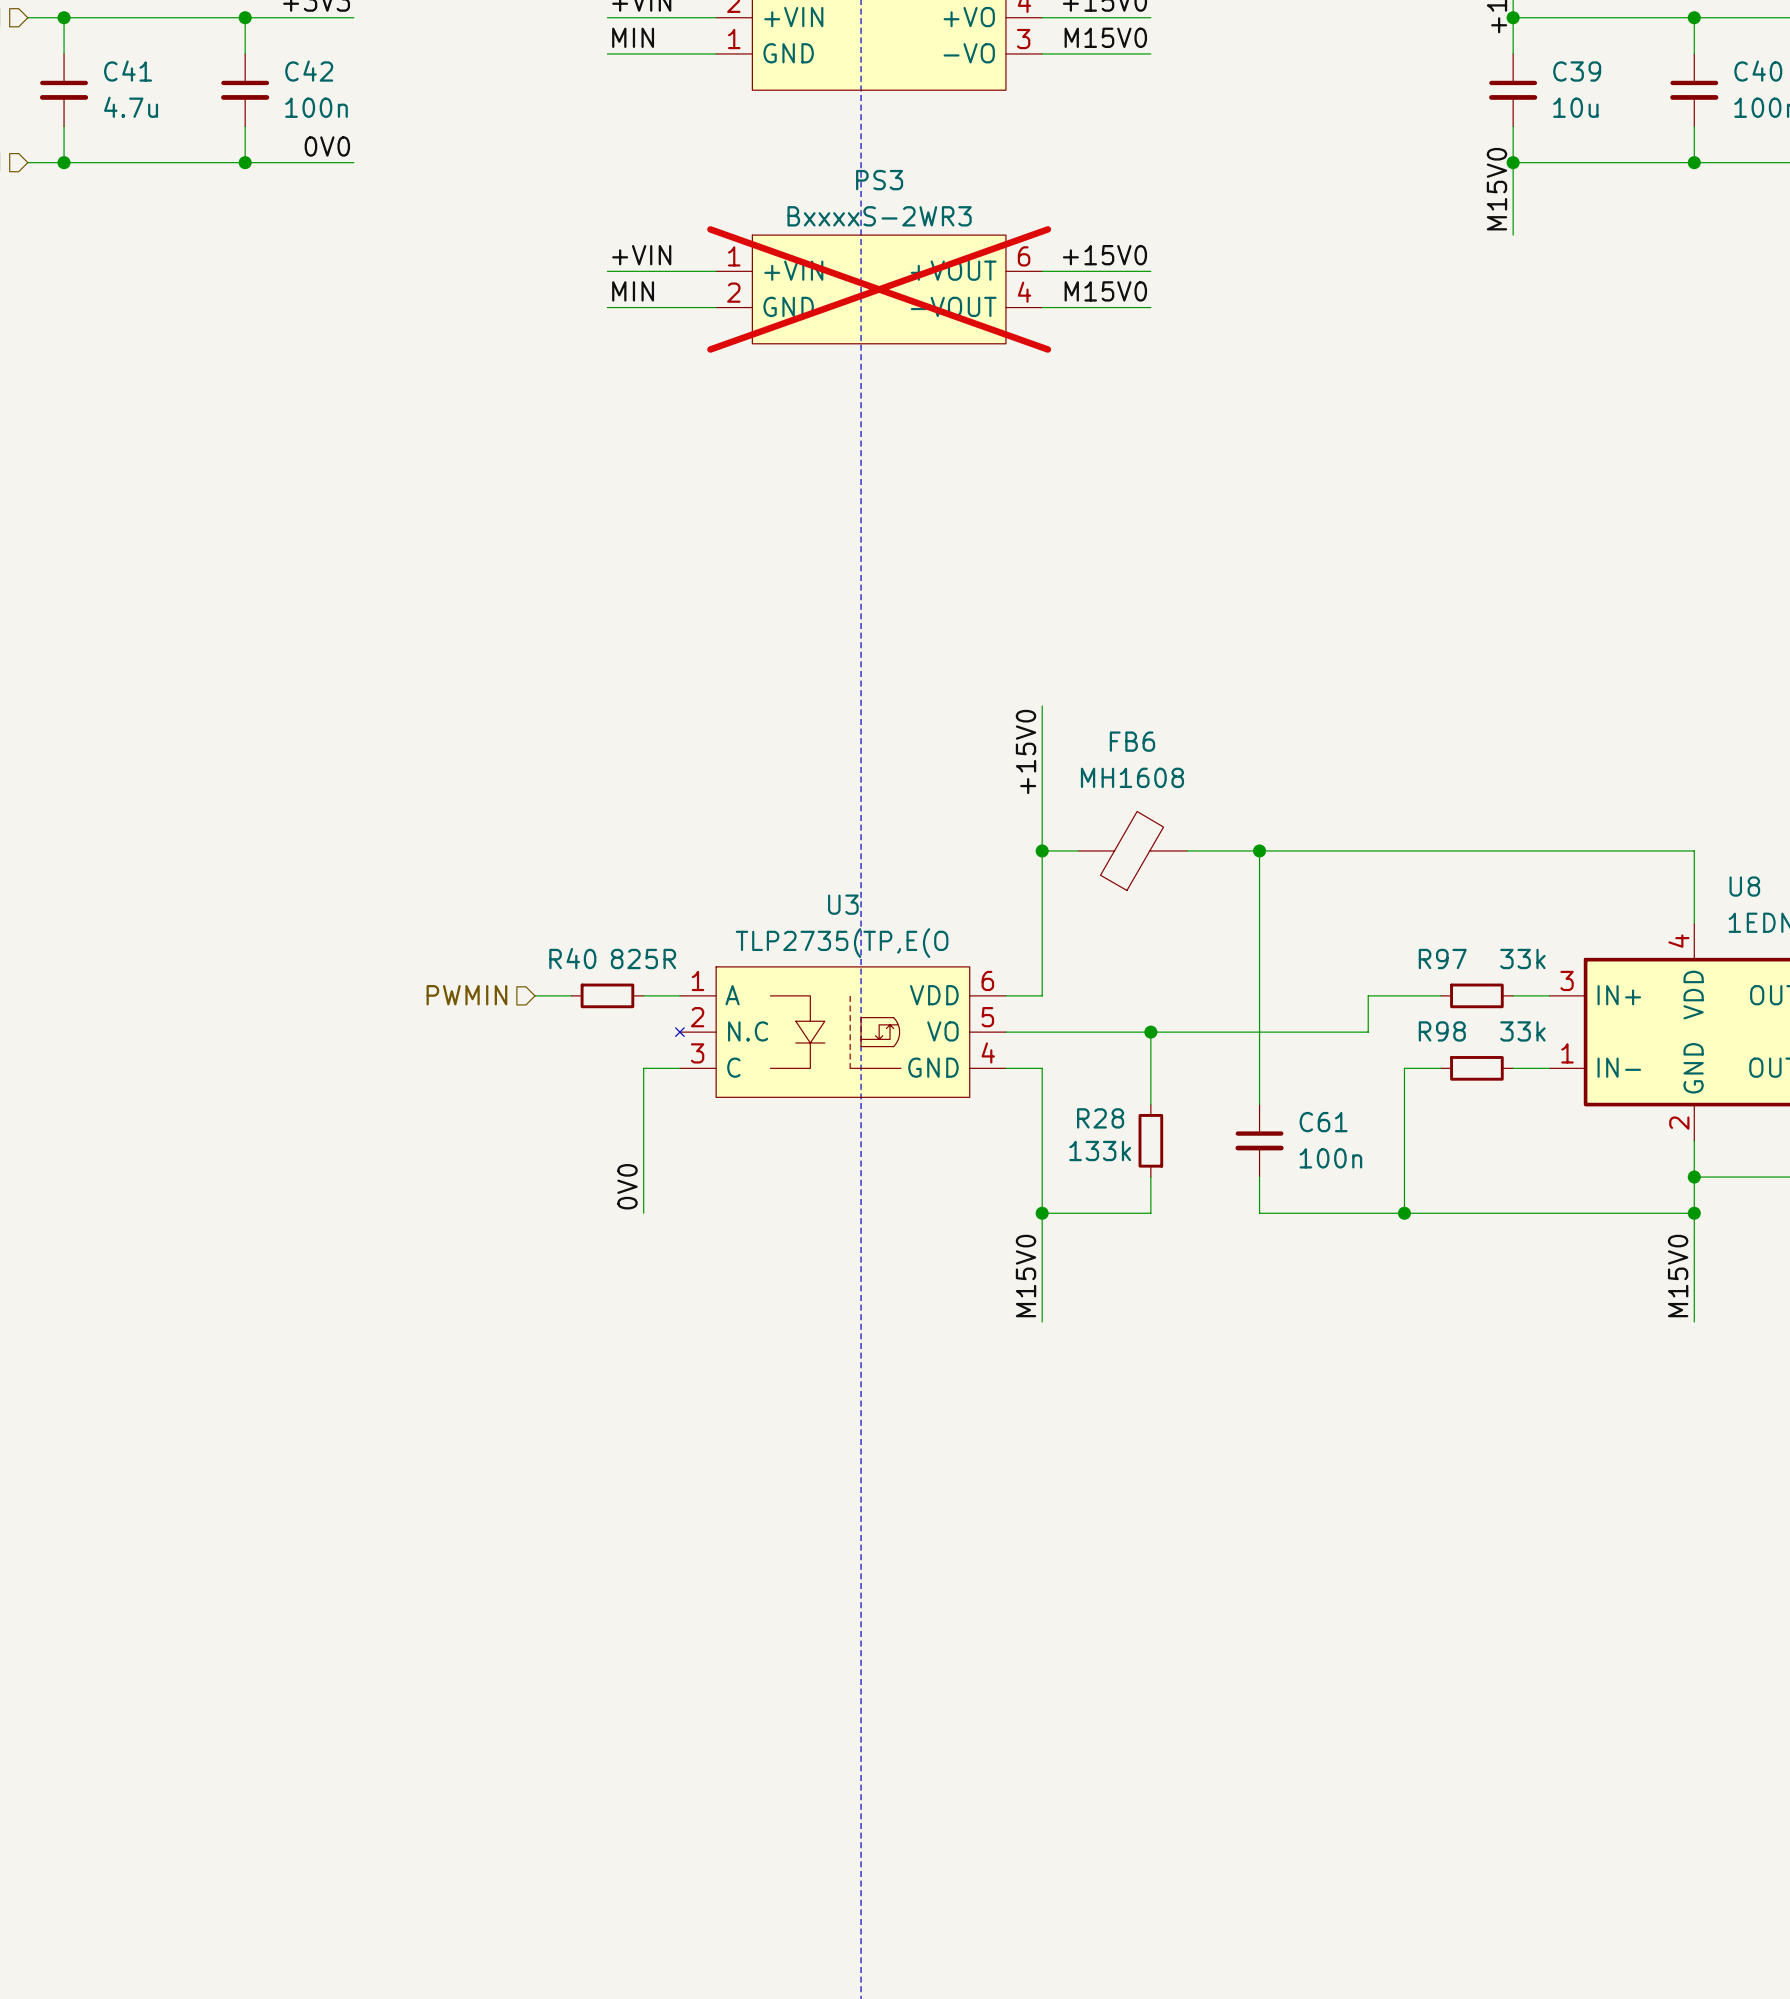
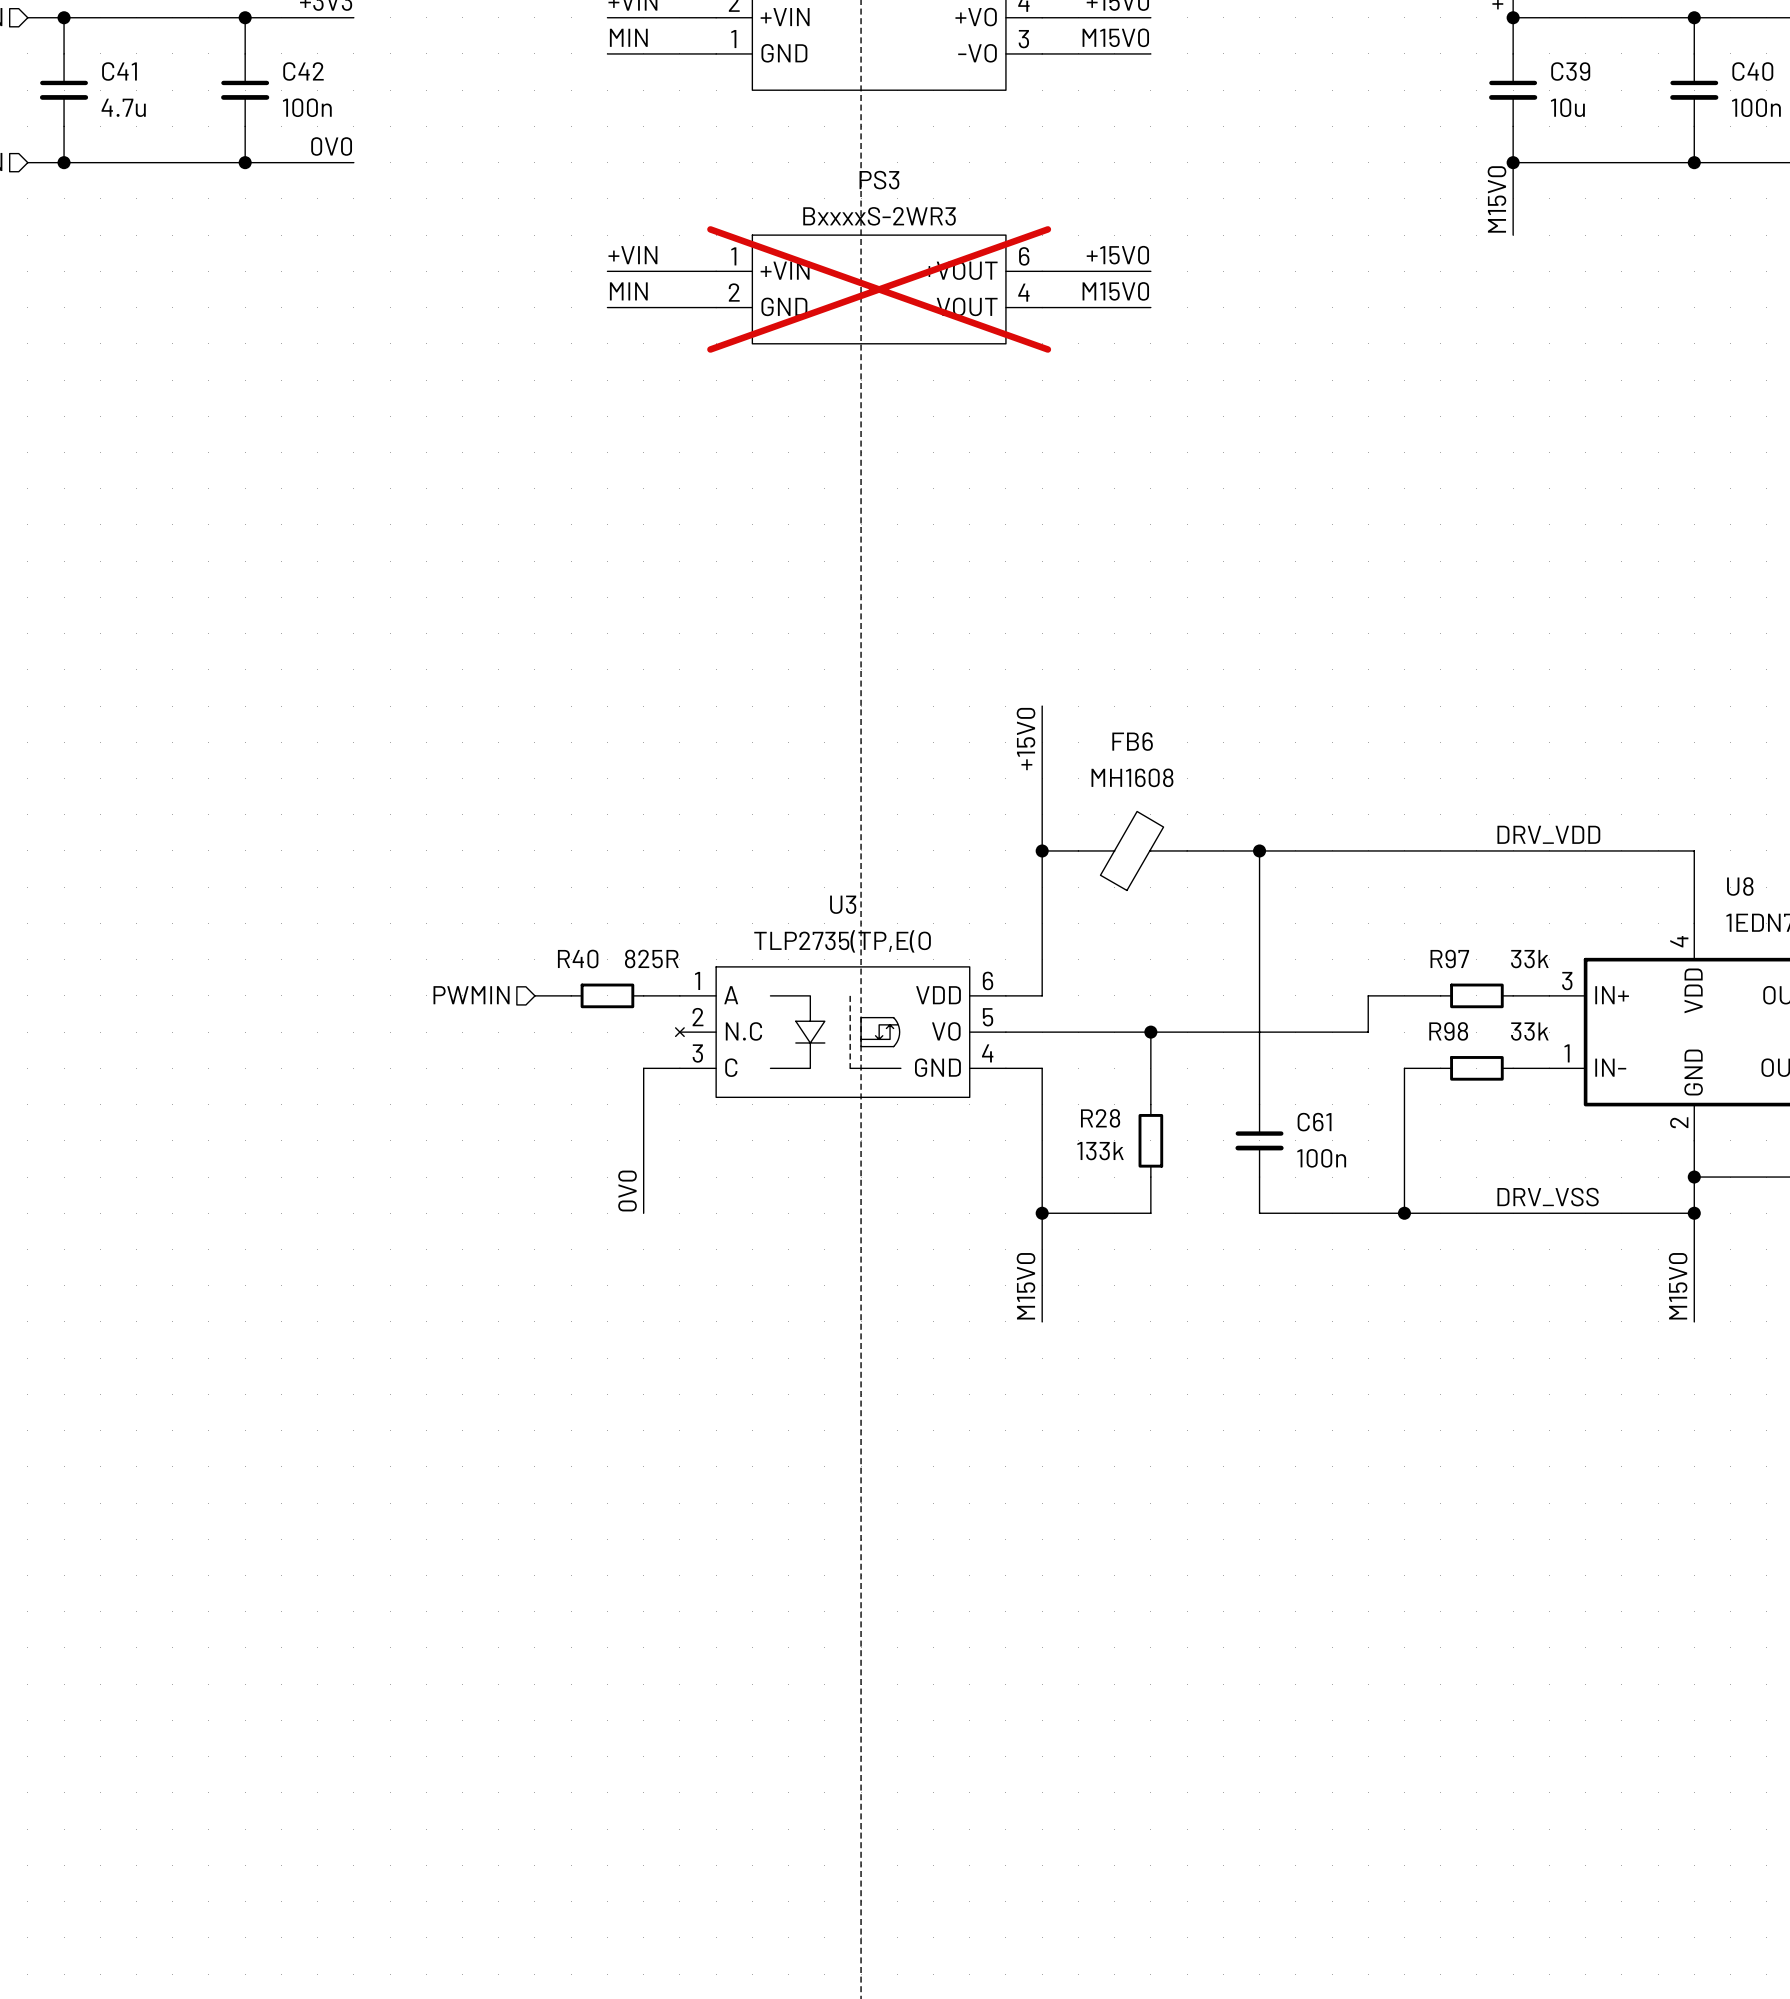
label: none -> DRV_VDD (1548, 834)
label: none -> DRV_VSS (1548, 1197)

